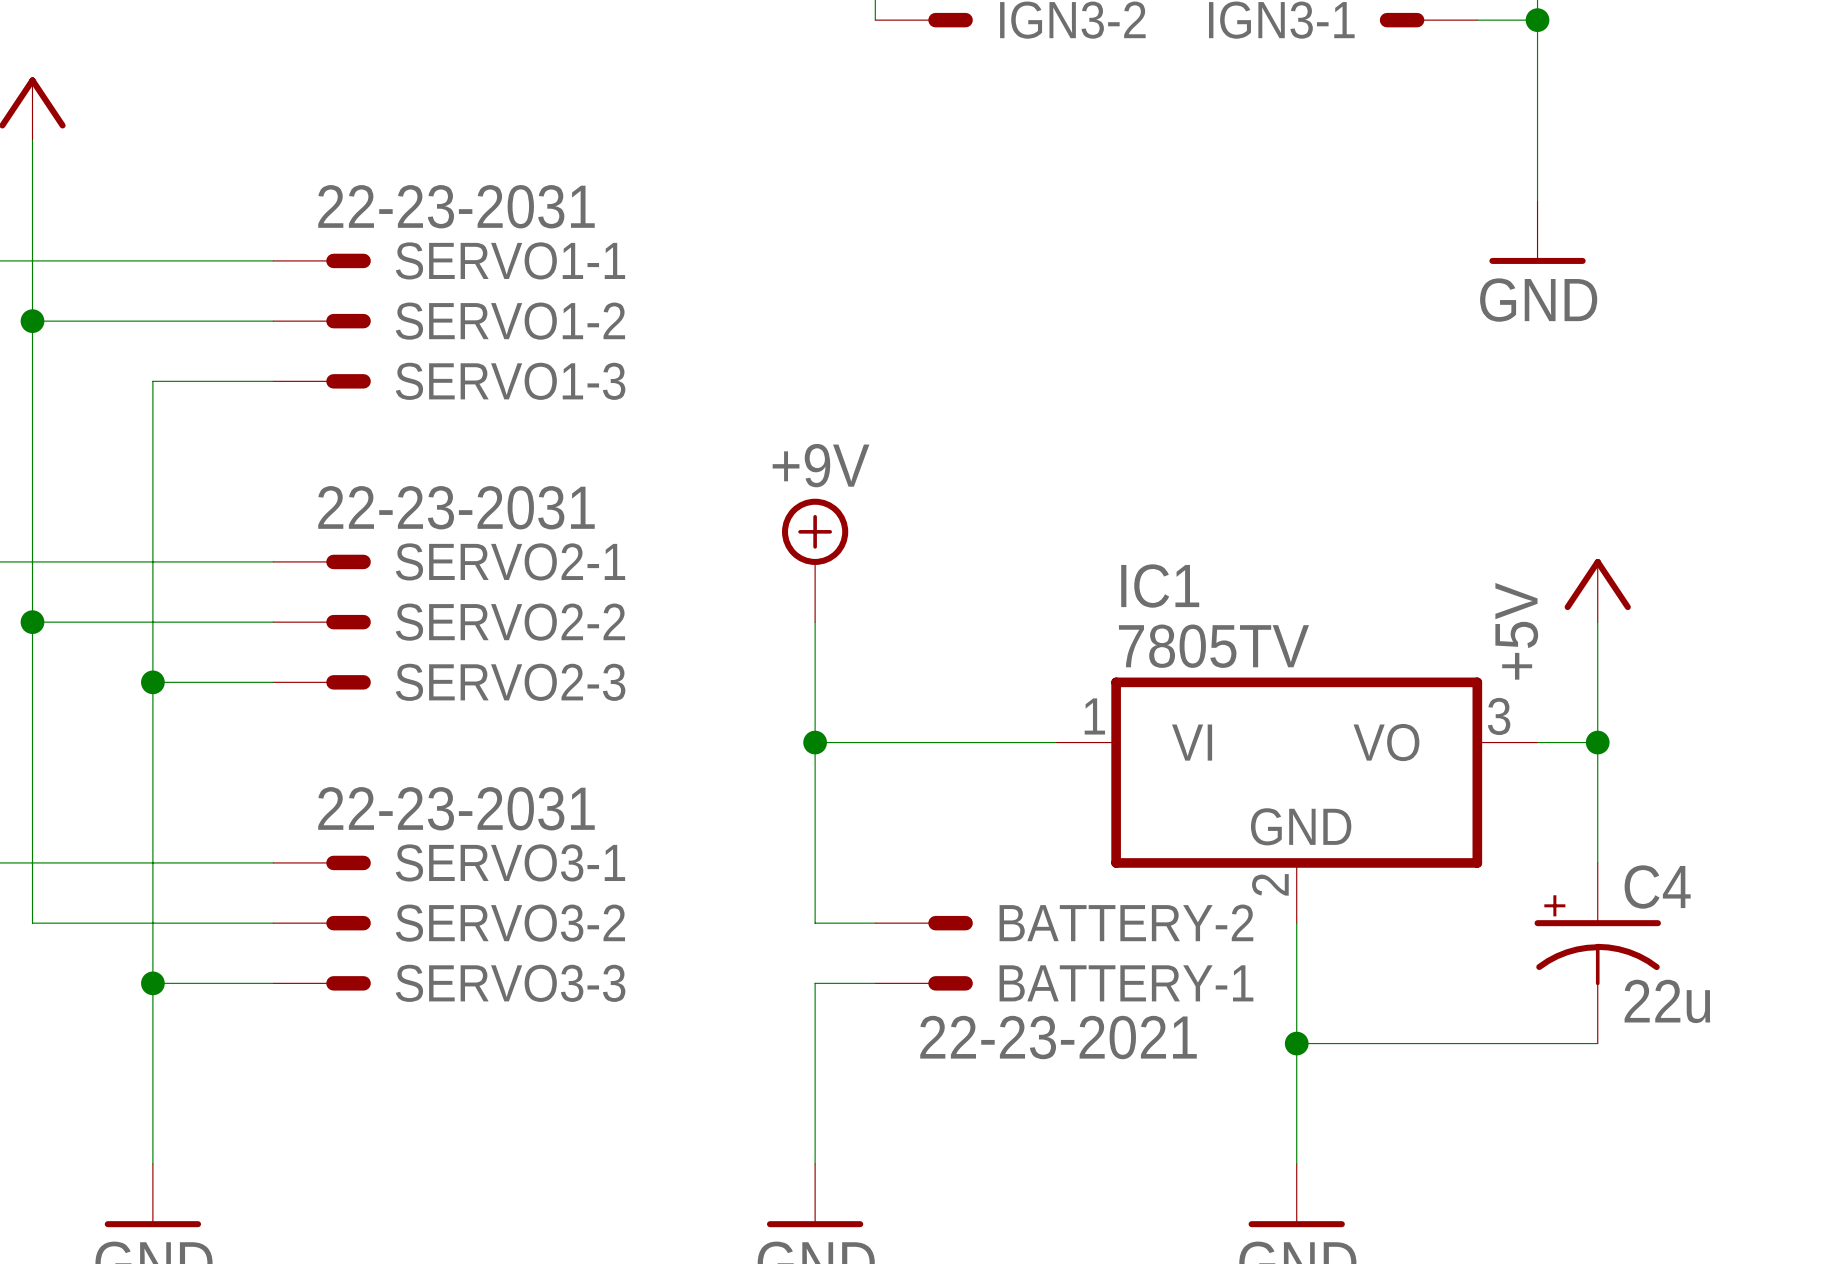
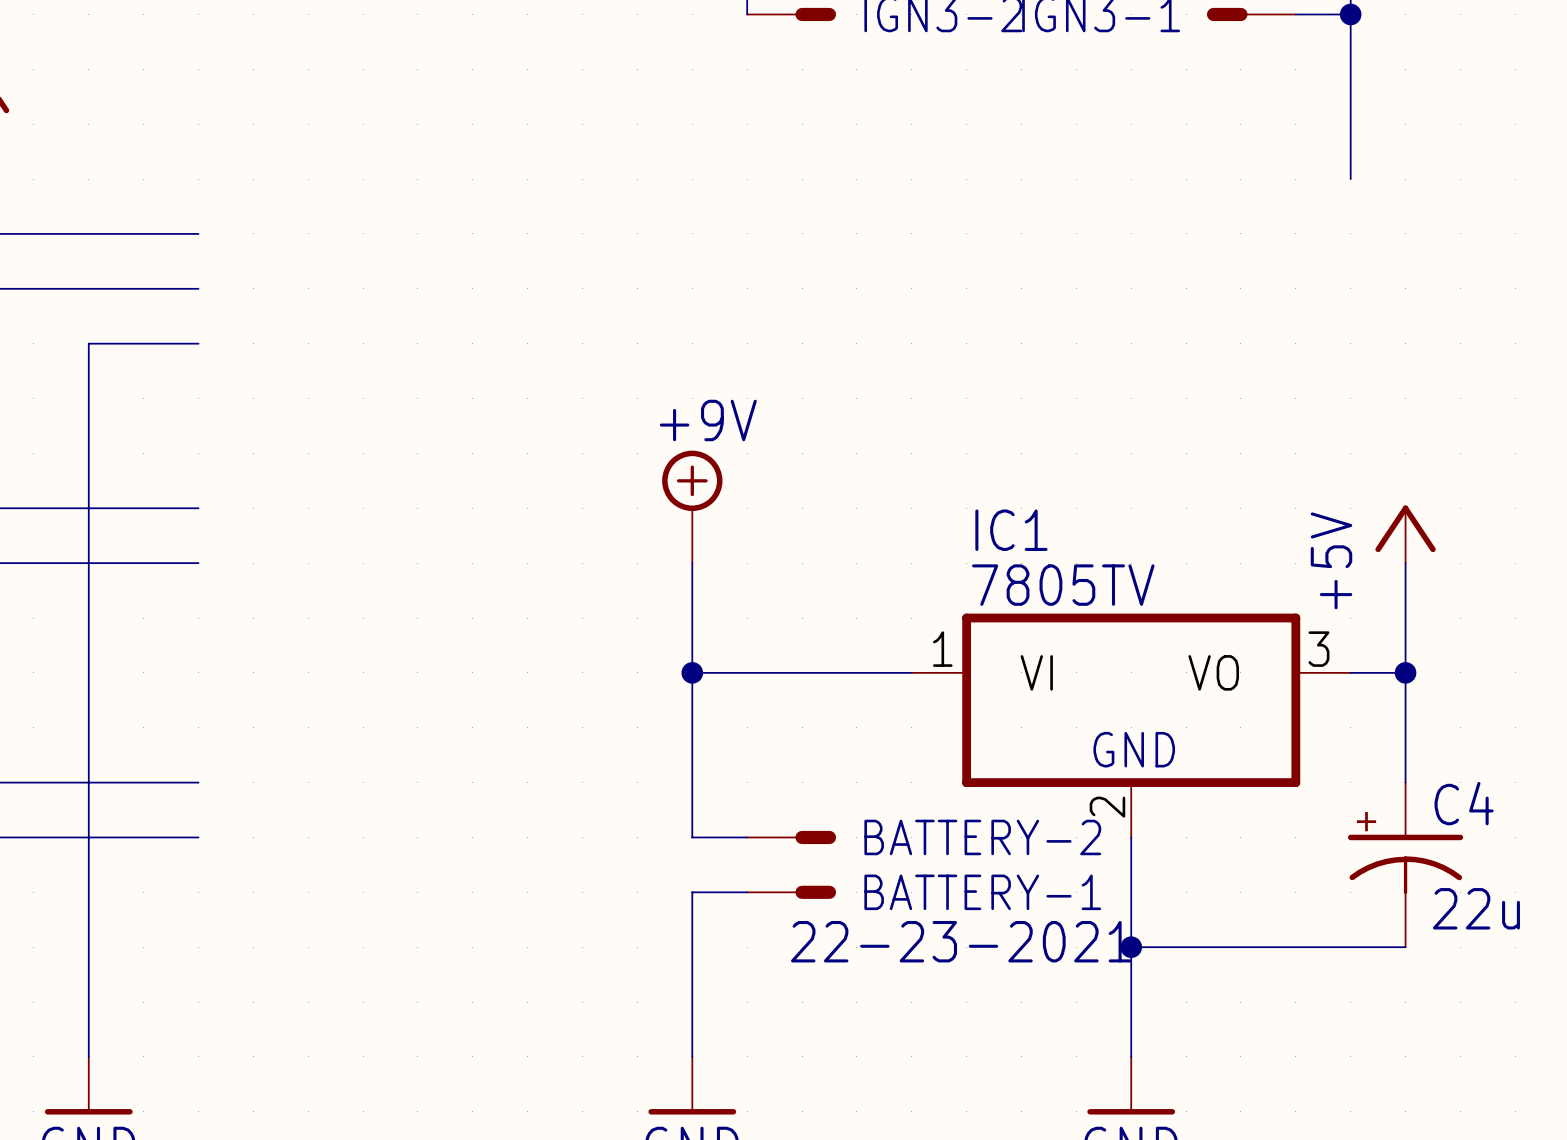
power symbol: GND (1537, 232) -> none
SERVO1-1: 22-23-2031 (322, 260) -> none
SERVO1-2: (322, 321) -> none
SERVO1-3: (322, 381) -> none
SERVO2-1: 22-23-2031 (322, 561) -> none
SERVO2-2: (322, 622) -> none
wire: (152, 682) (273, 682) -> none
junction: (152, 682) -> none
SERVO2-3: (322, 682) -> none
SERVO3-1: 22-23-2031 (322, 862) -> none
SERVO3-2: (322, 923) -> none
wire: (152, 983) (273, 983) -> none
junction: (152, 983) -> none
SERVO3-3: (322, 983) -> none

